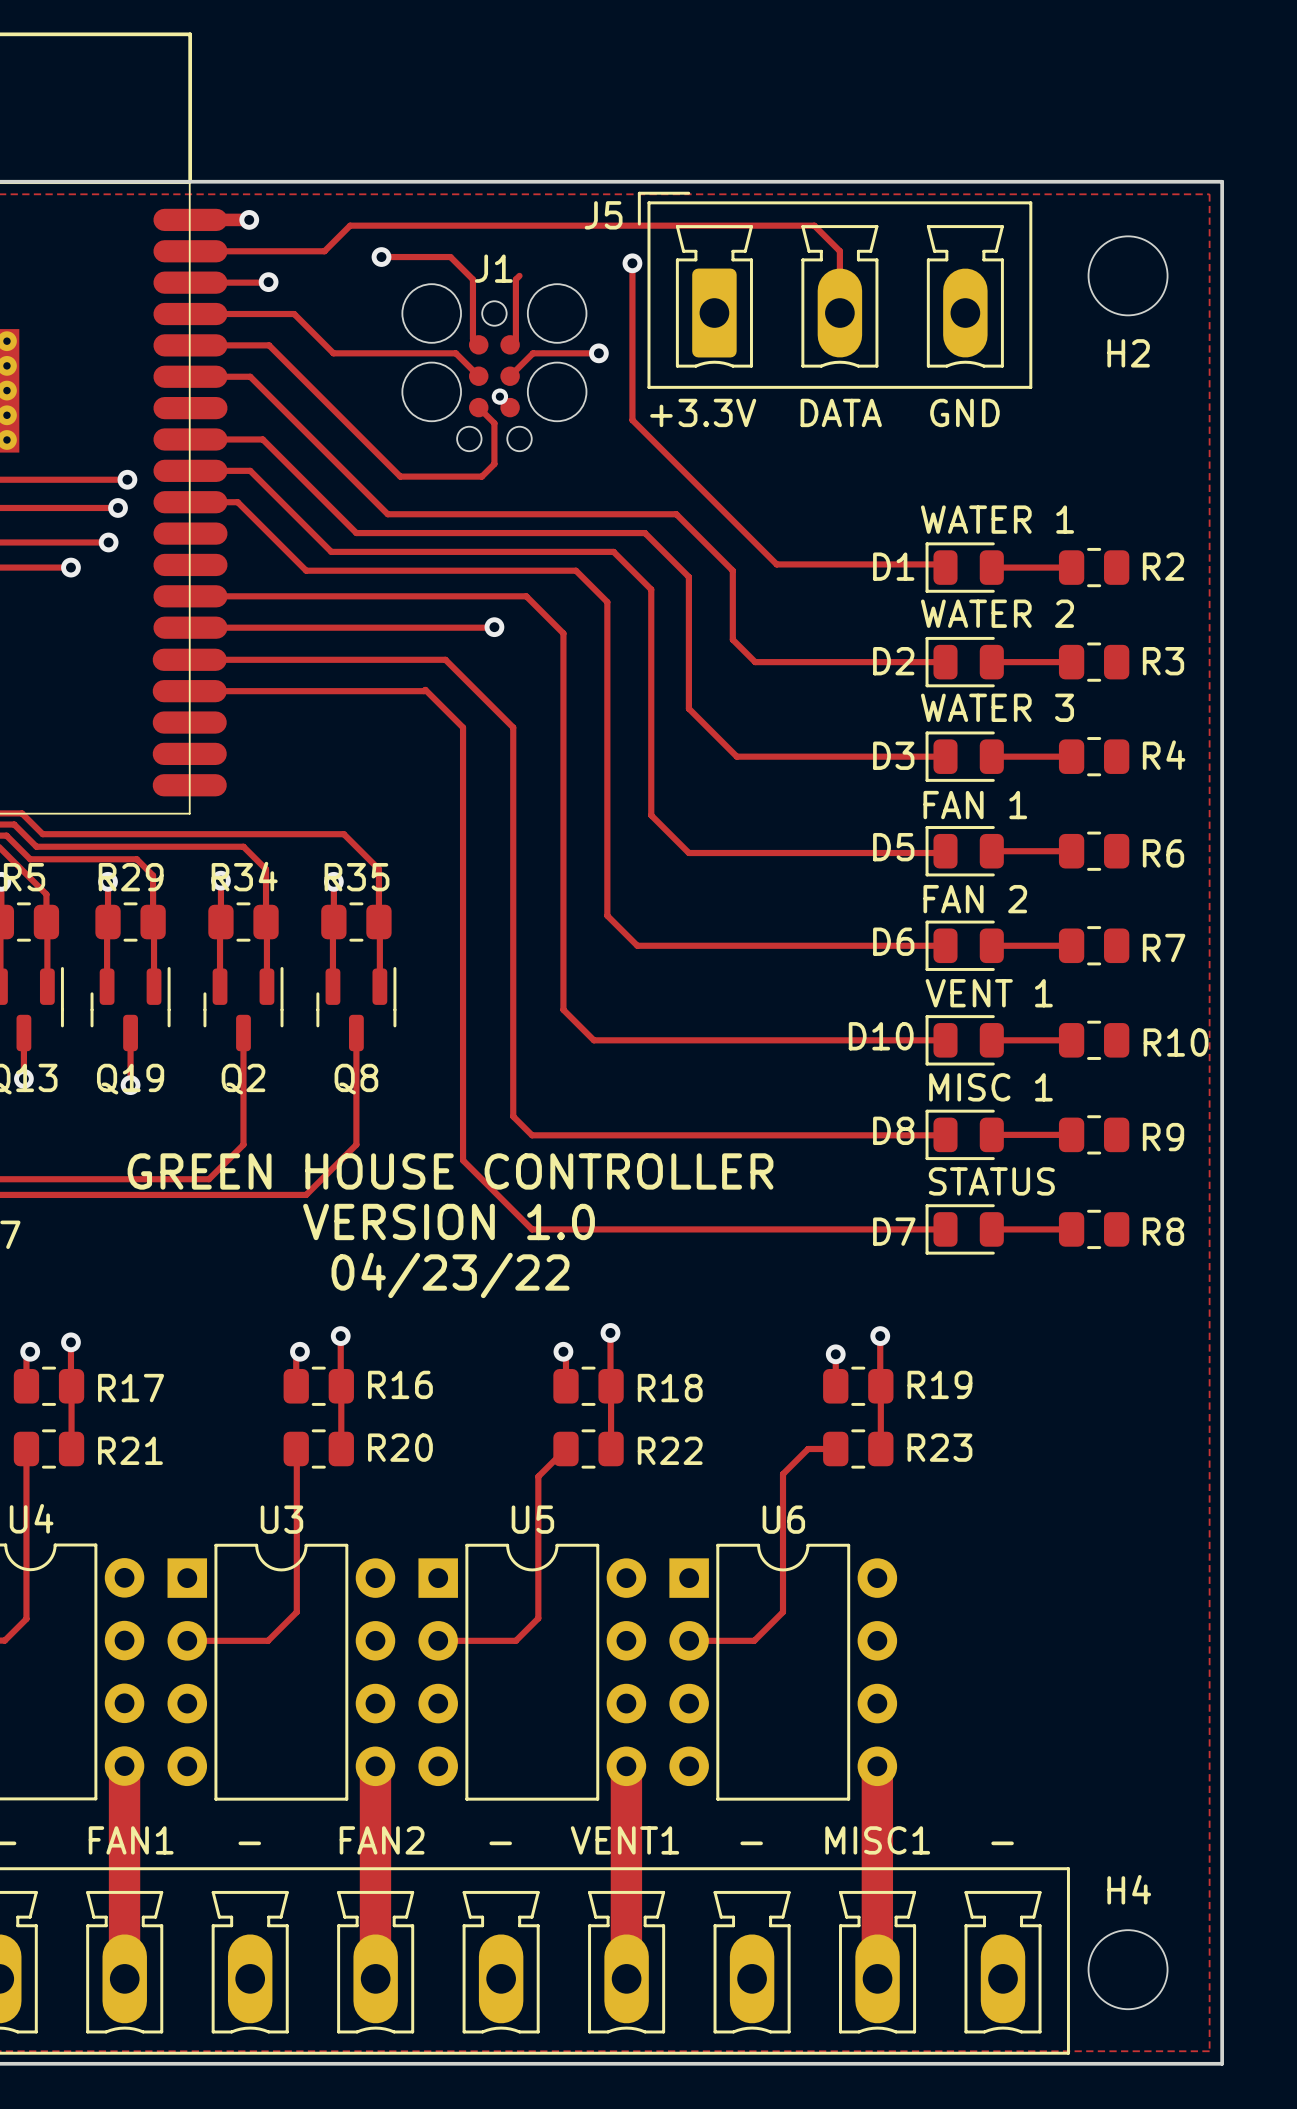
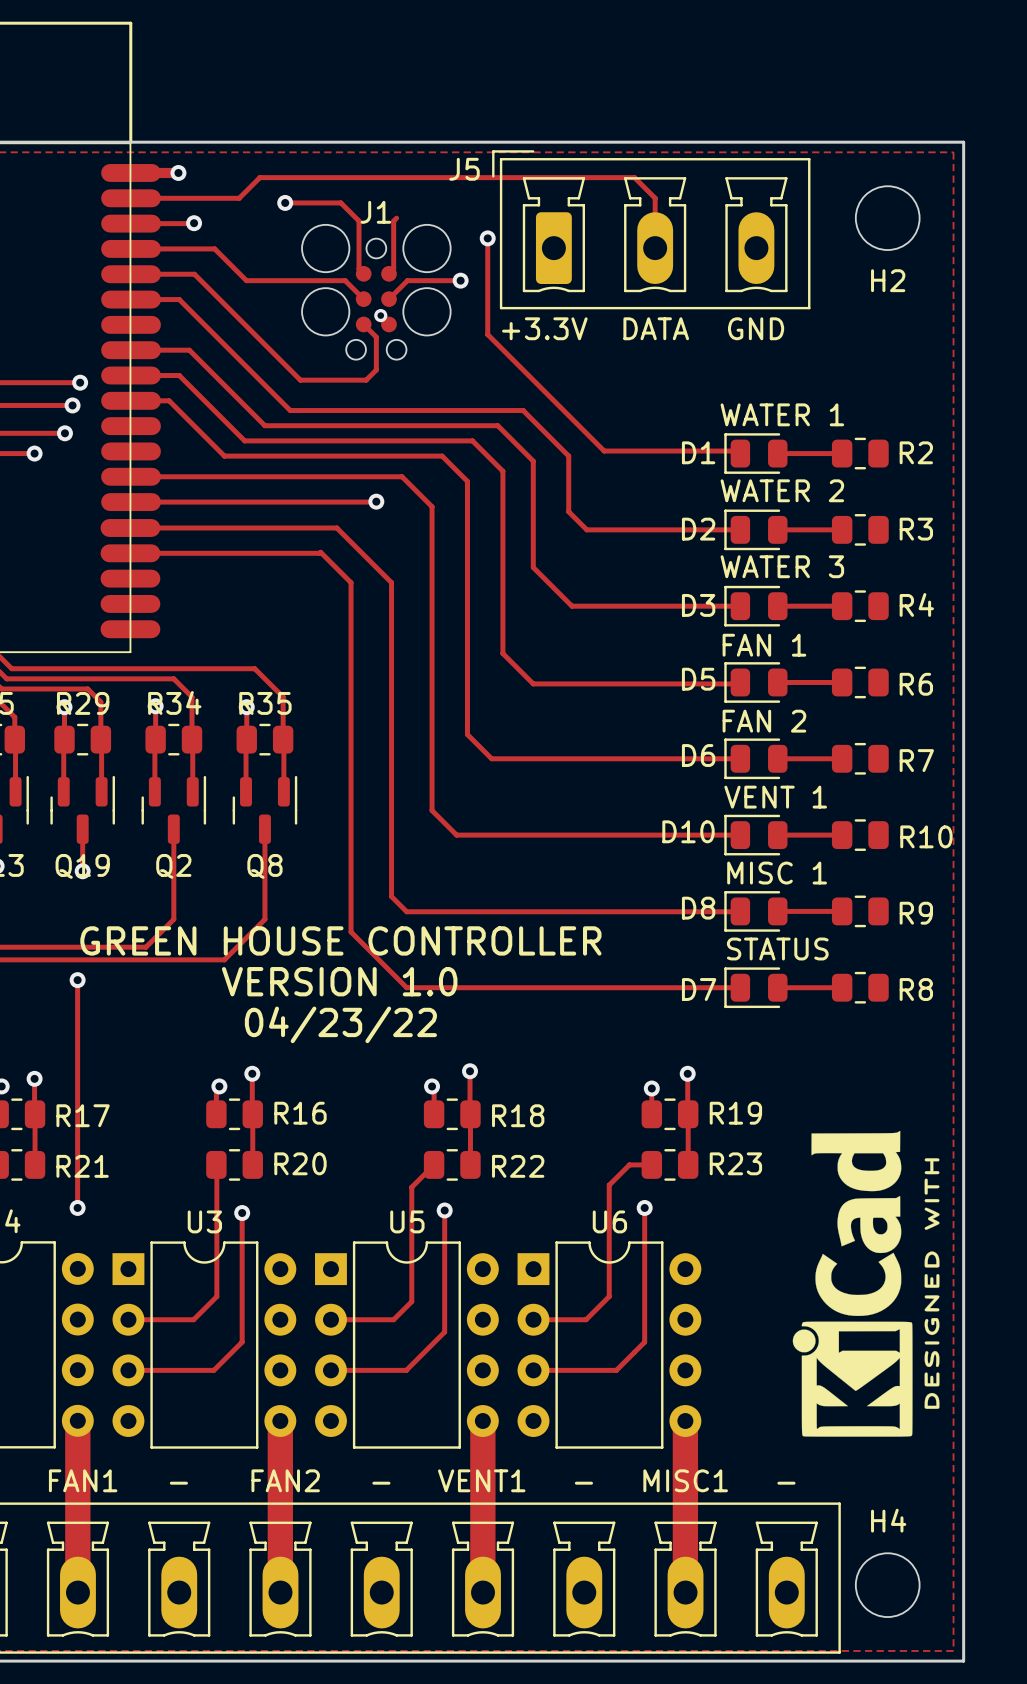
track: (632, 263) (632, 300) -> none
via position: (632, 263) -> (487, 238)
track: none -> (77, 980) (77, 1207)
via: none -> (77, 980)
drawing: none -> [792, 1130, 940, 1437]
via: none -> (77, 1207)
track: none -> (644, 1207) (644, 1342) (616, 1370) (533, 1370)
via: none -> (644, 1207)
track: none -> (444, 1210) (444, 1332) (406, 1370) (330, 1370)
via: none -> (444, 1210)
track: none -> (242, 1213) (242, 1342) (213, 1370) (128, 1370)
via: none -> (242, 1213)

